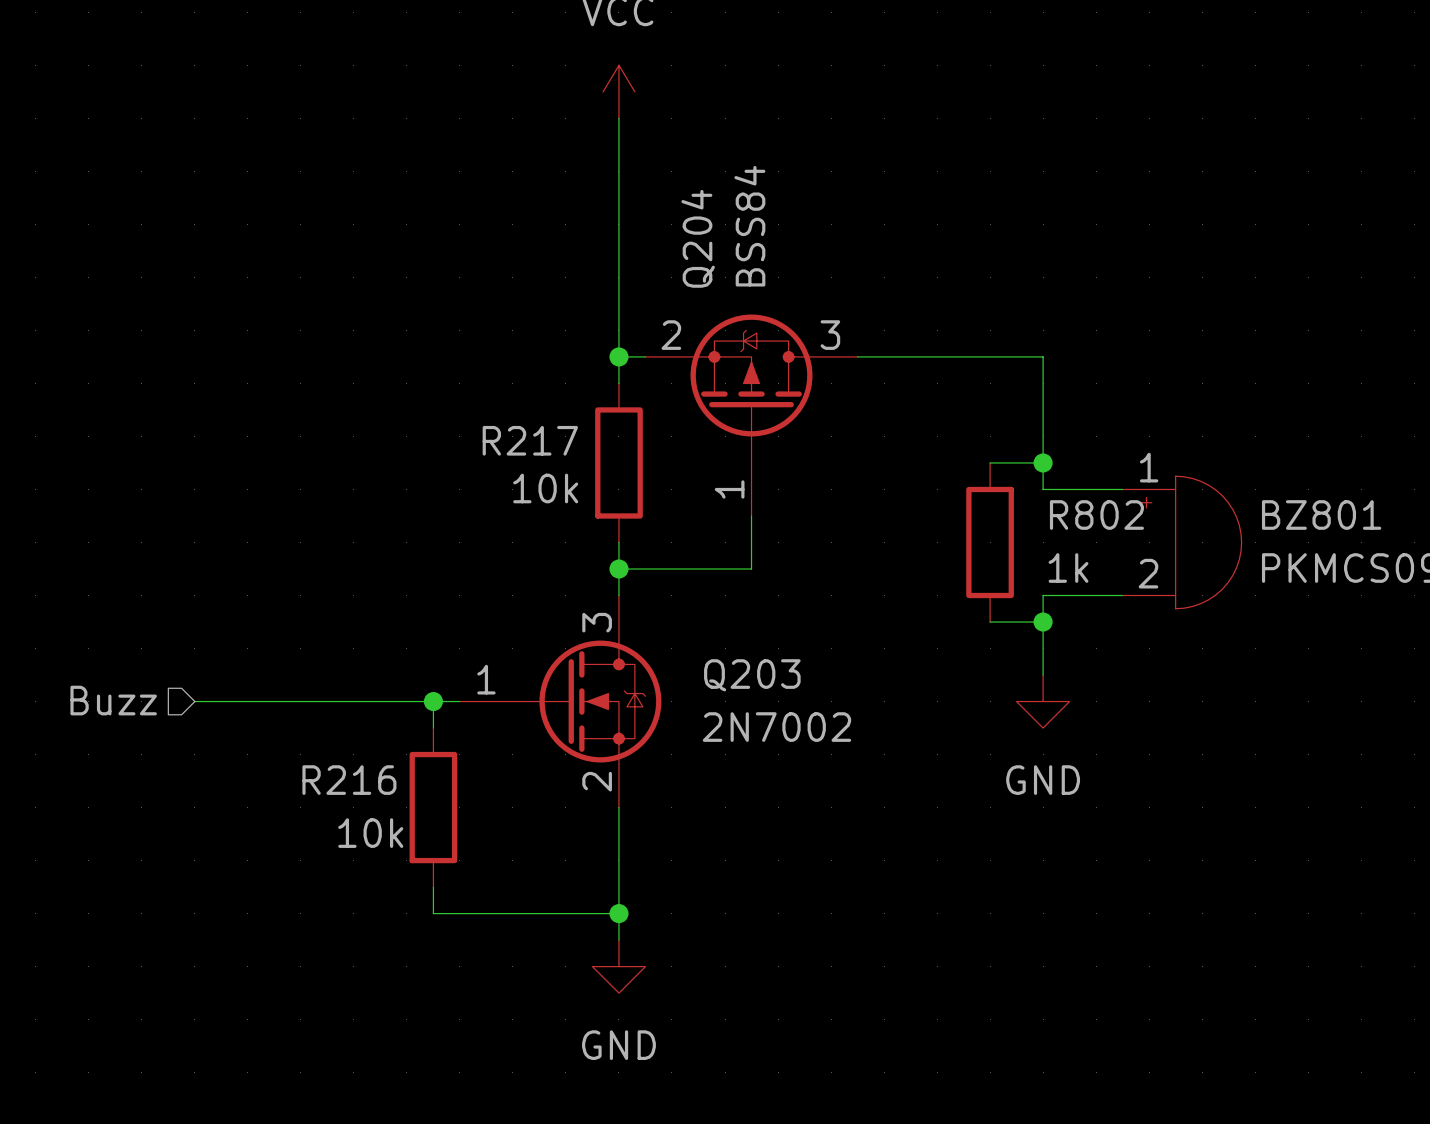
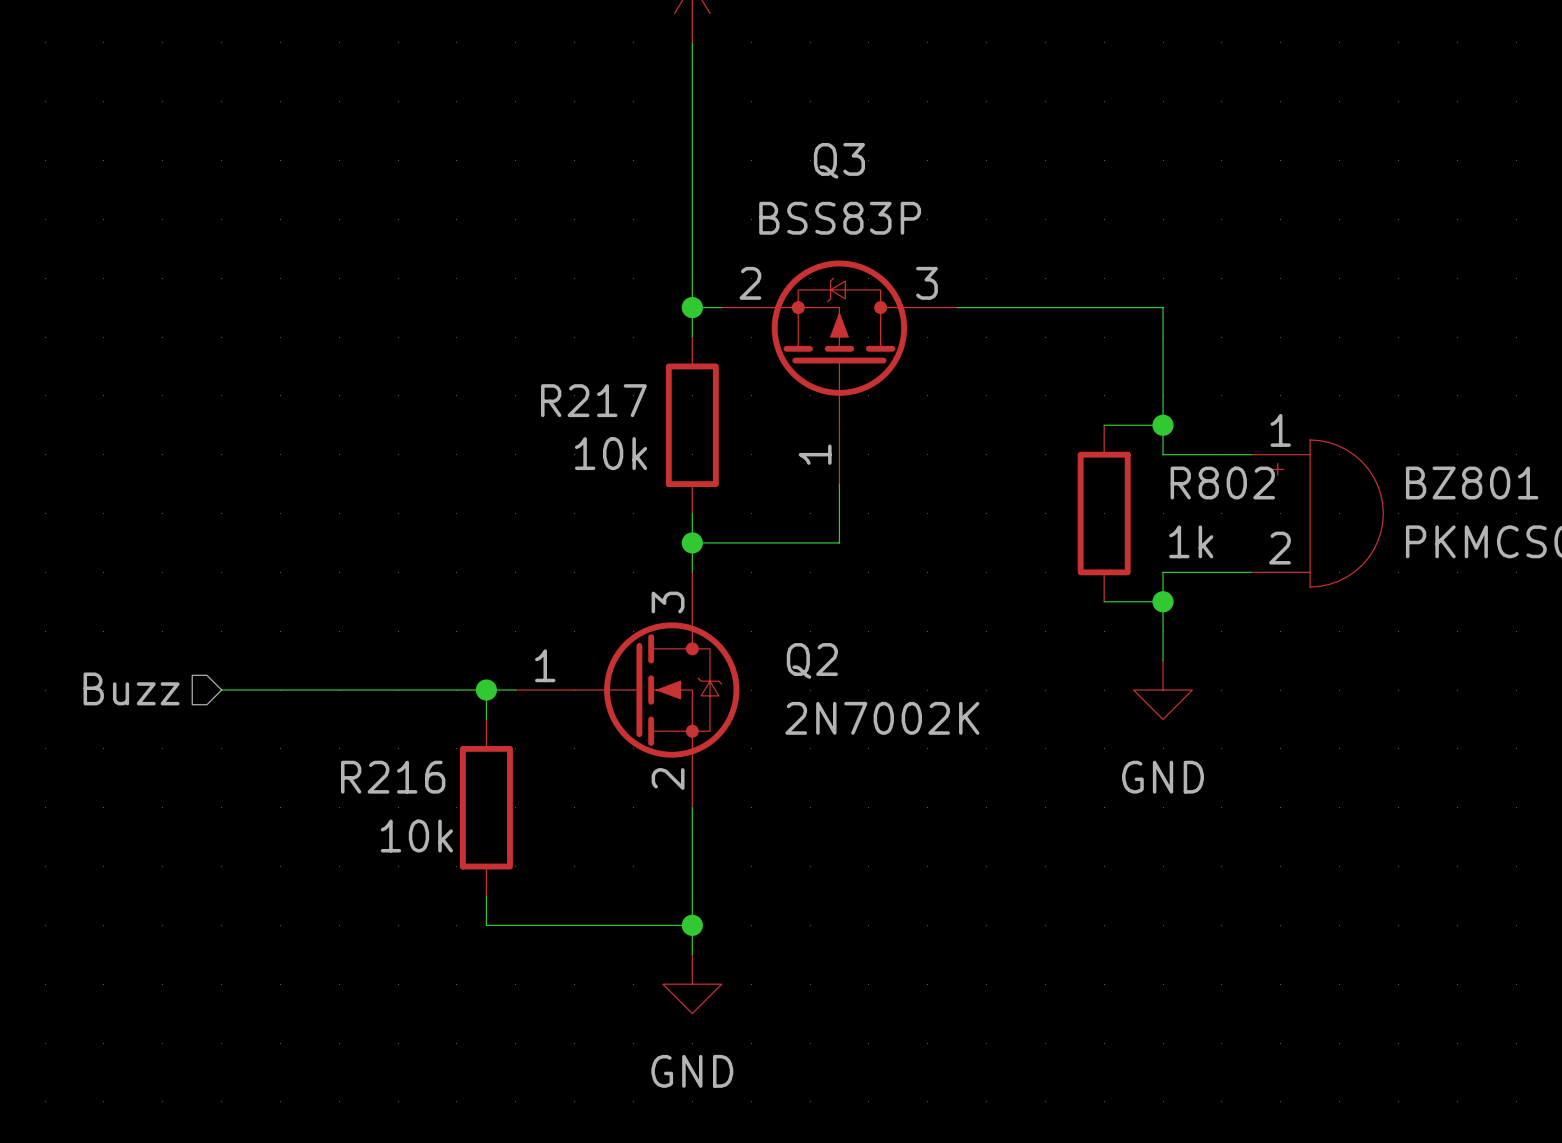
Q204 value: BSS84 (749, 226) -> BSS83P (840, 218)
Q204 name: Q204 (698, 238) -> Q3 (839, 160)
Q203 name: Q203 (752, 675) -> Q2 (812, 660)
Q203 value: 2N7002 (776, 727) -> 2N7002K (882, 718)

